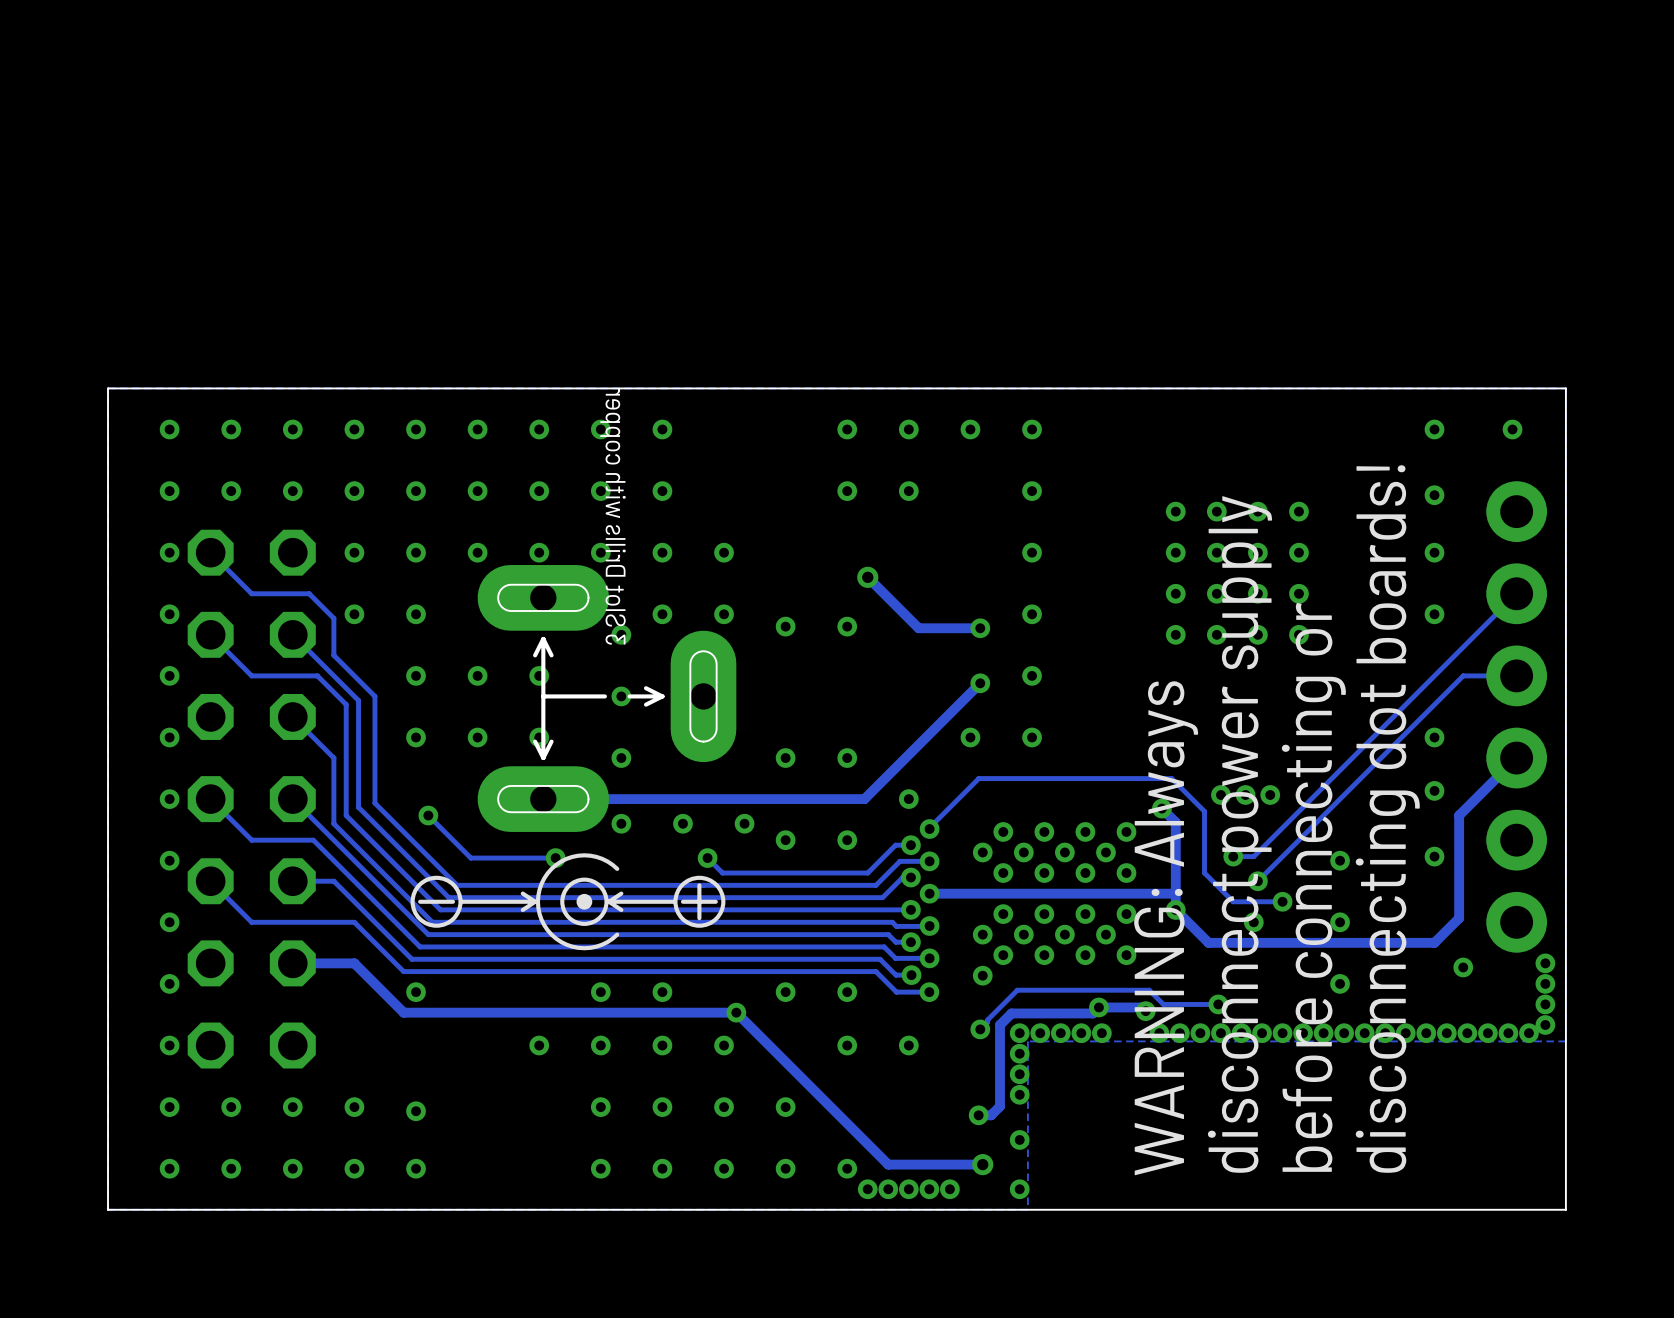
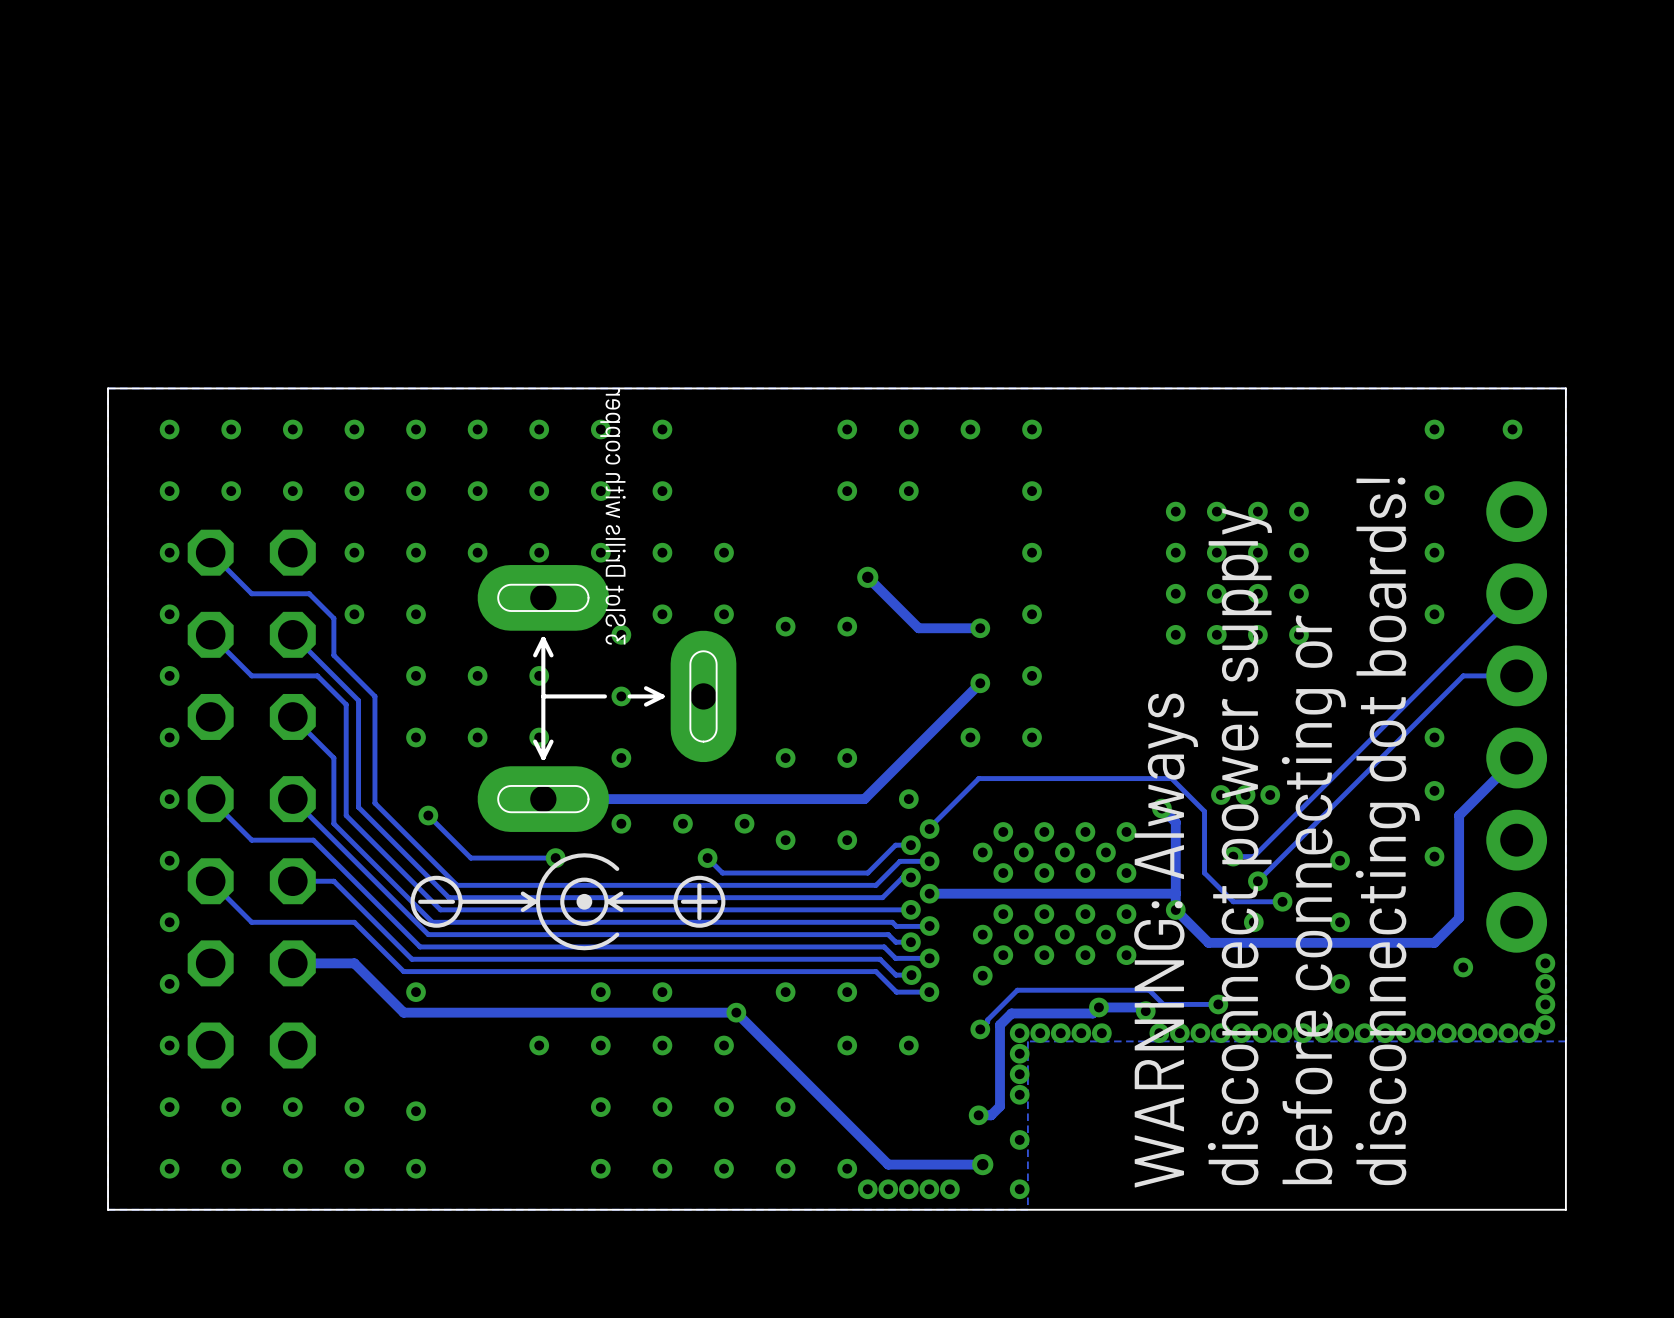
text position: disconnecting dot boards! (1387, 819) -> disconnecting dot boards! (1387, 831)
text position: disconnect power supply (1239, 834) -> disconnect power supply (1239, 846)
text position: before connecting or (1313, 887) -> before connecting or (1313, 899)
text position: WARNING: Always (1166, 928) -> WARNING: Always (1166, 940)

